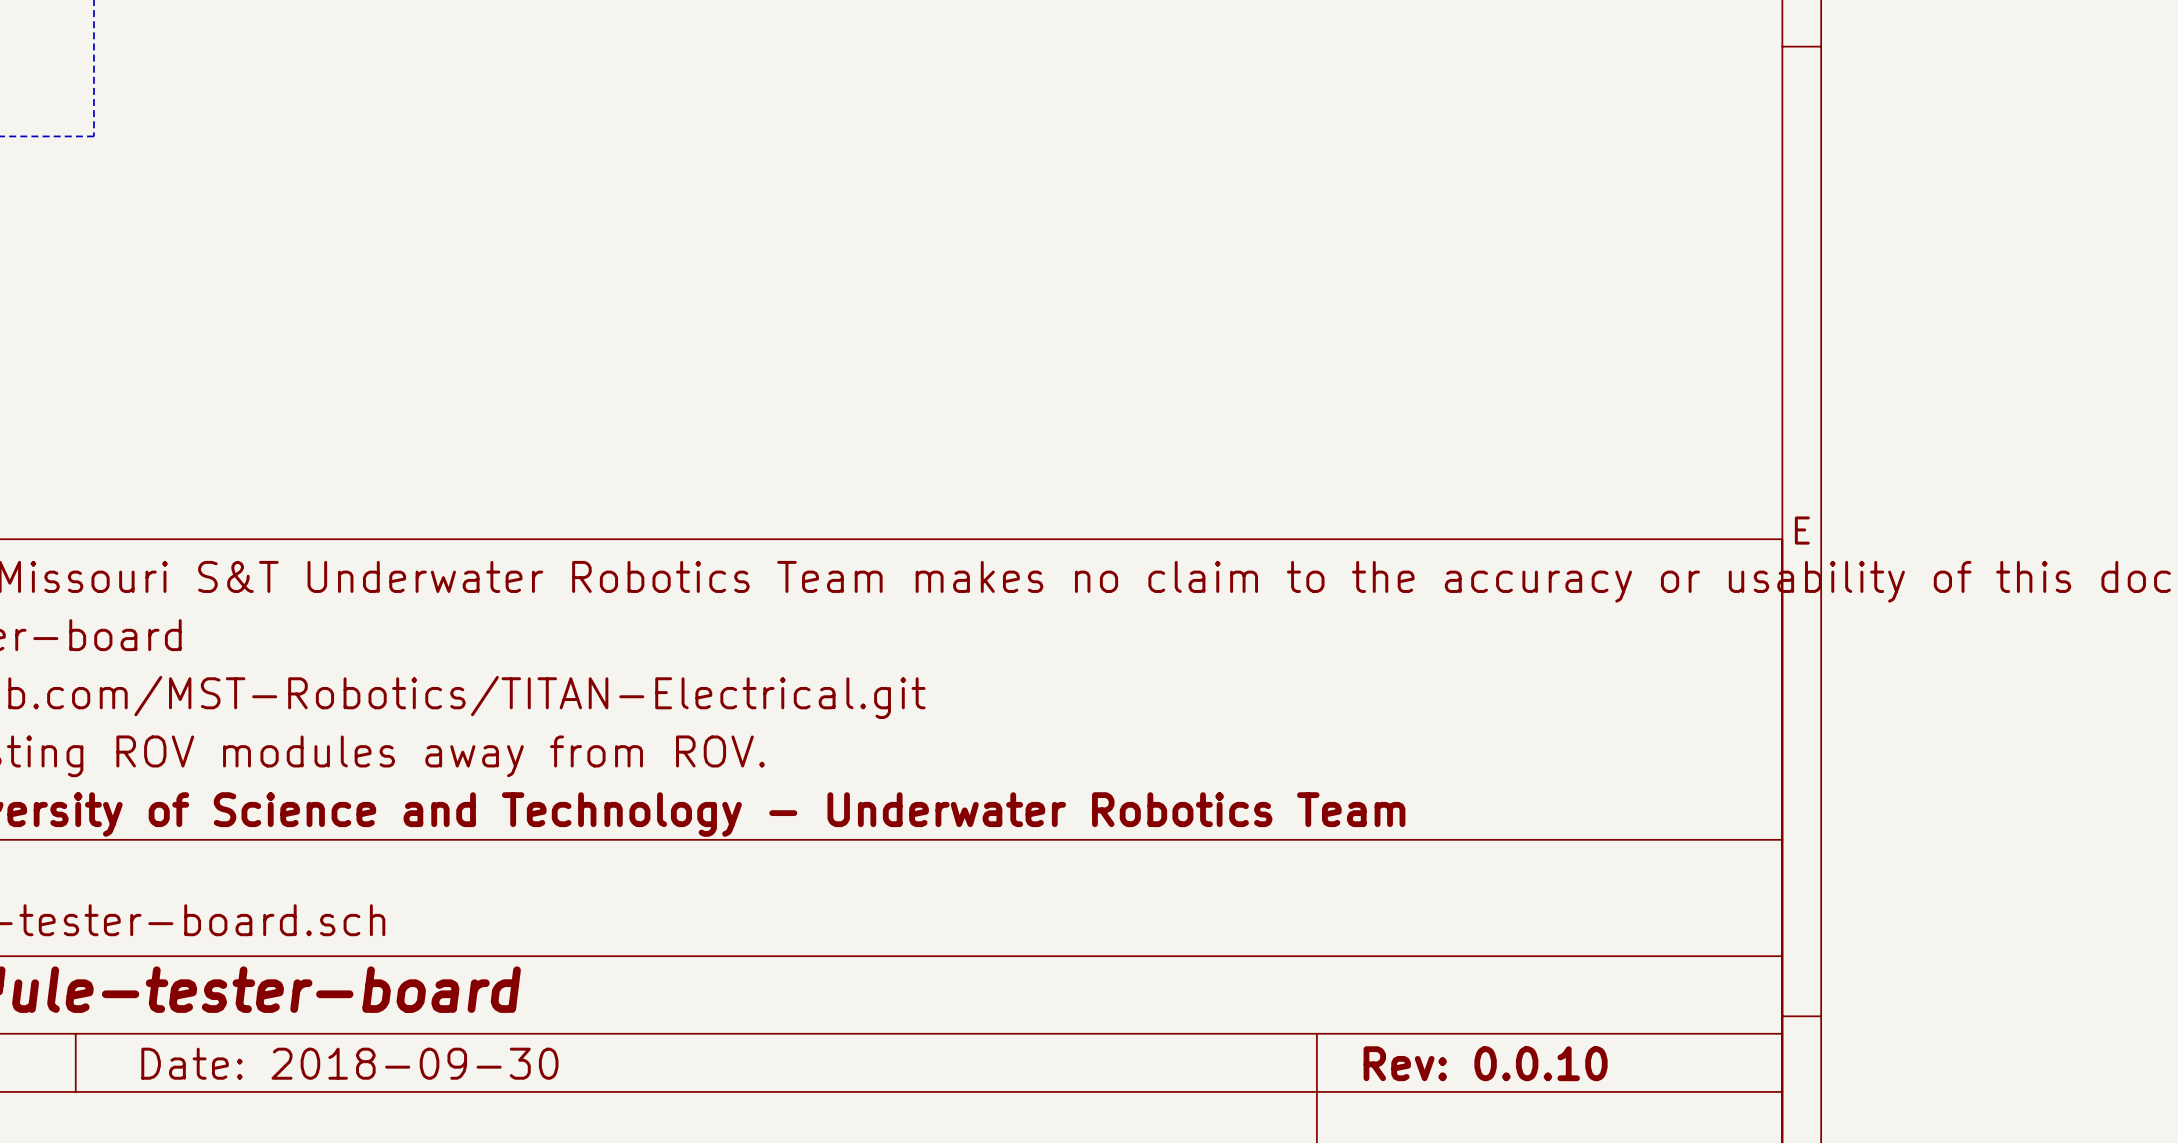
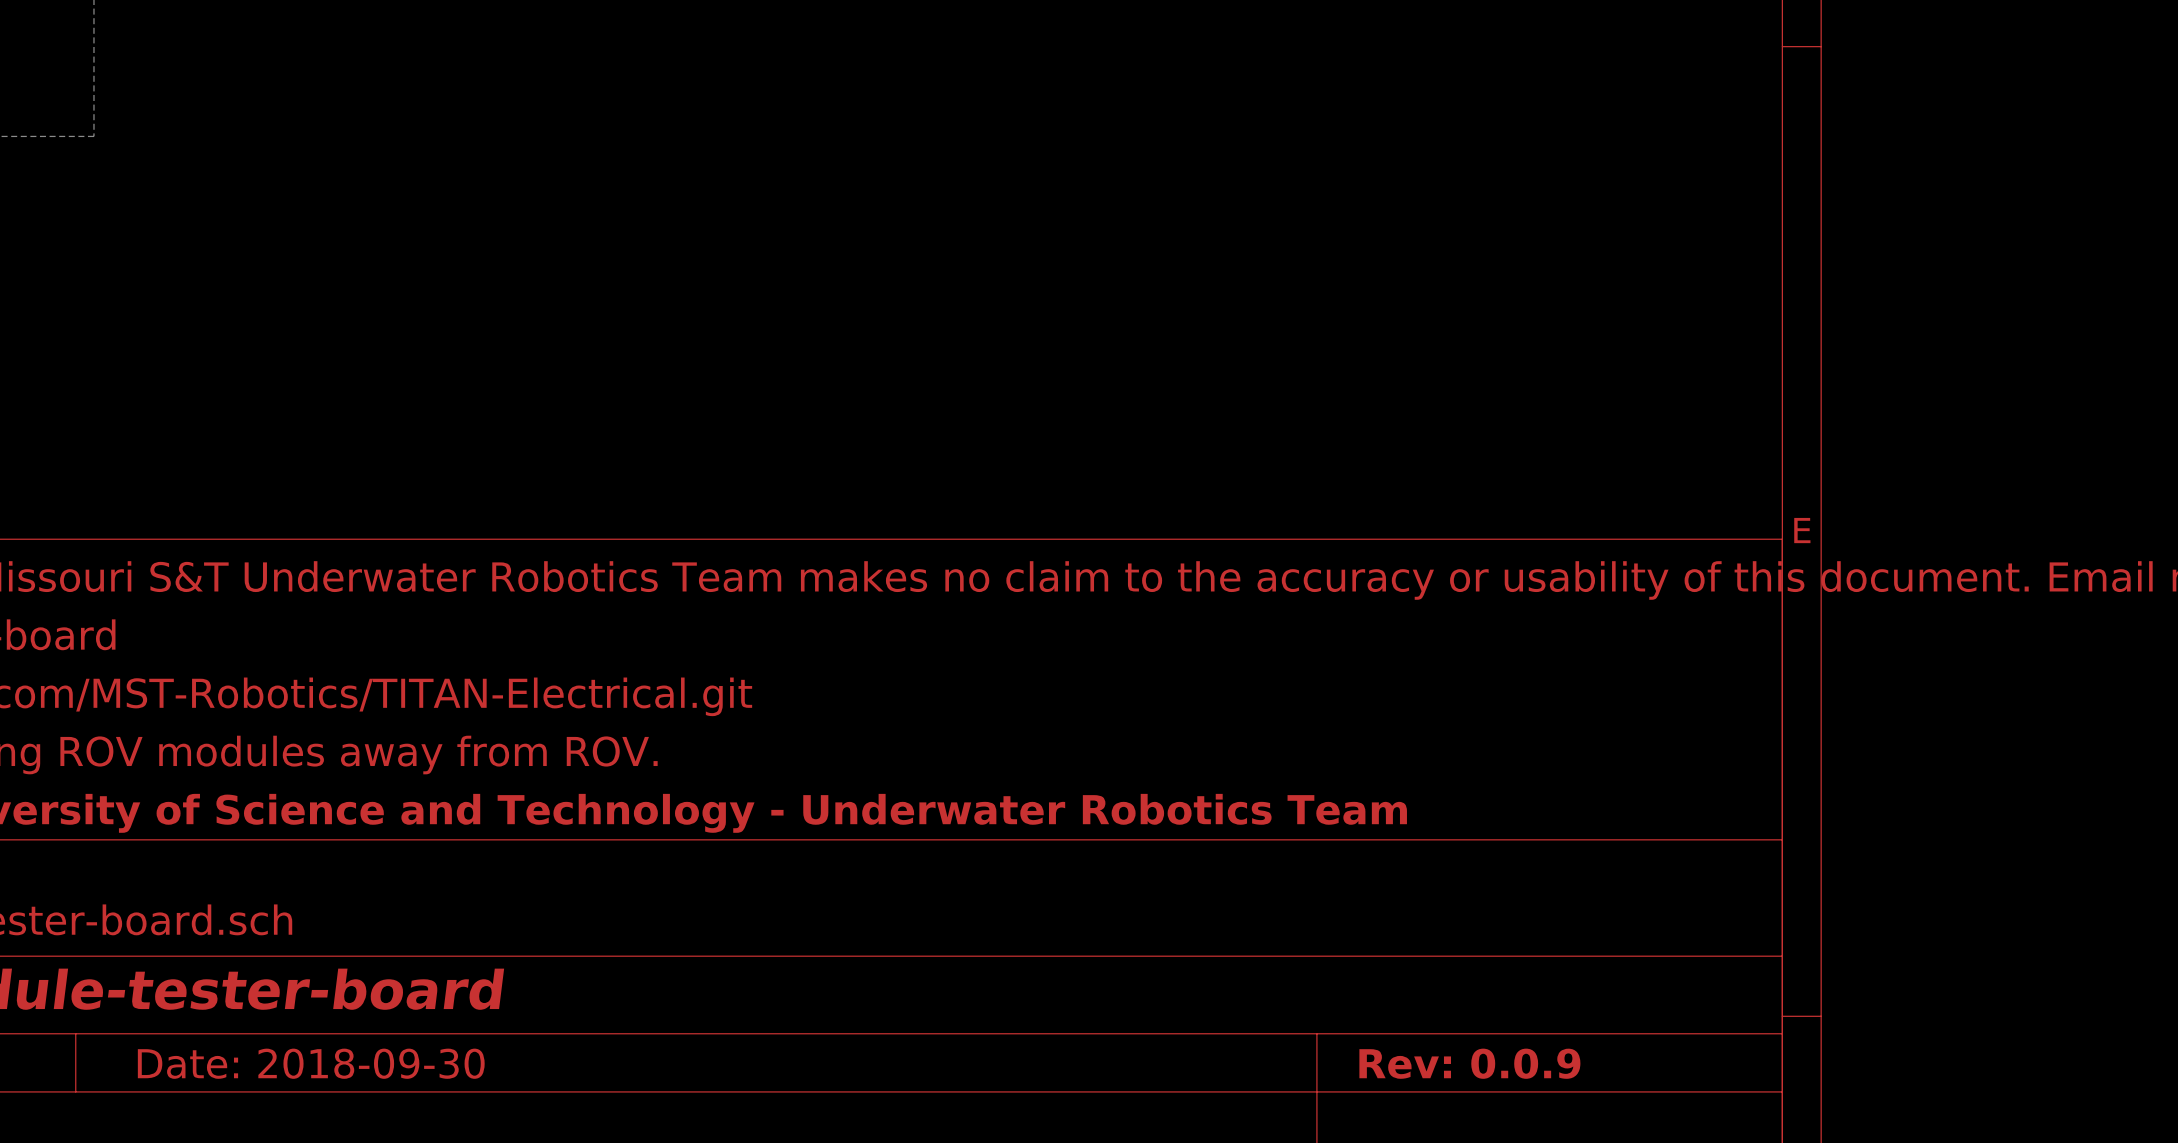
title block: Rev: 0.0.10 (1485, 1063) -> Rev: 0.0.9 (1469, 1063)

